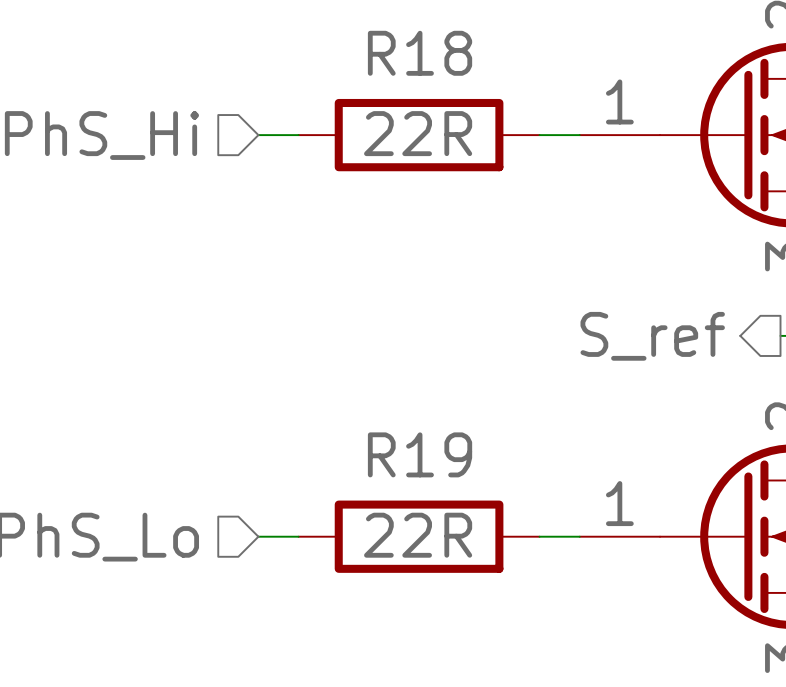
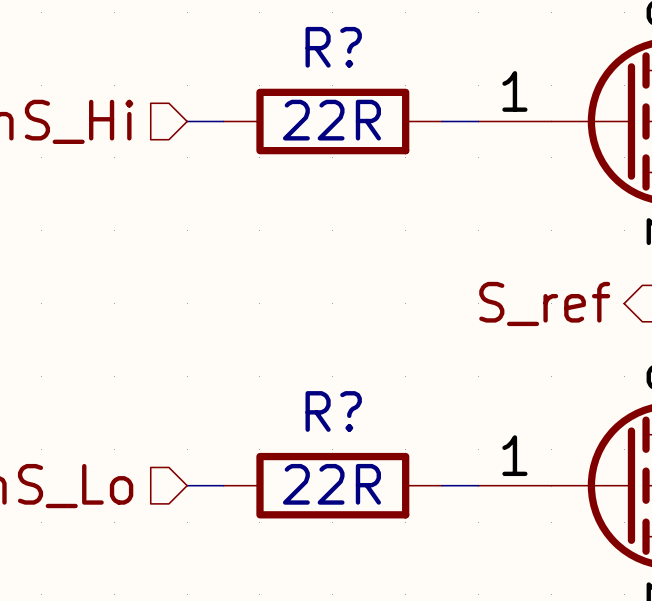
R18 name: R18 (420, 53) -> R? (333, 47)
R19 name: R19 (420, 454) -> R? (333, 411)

